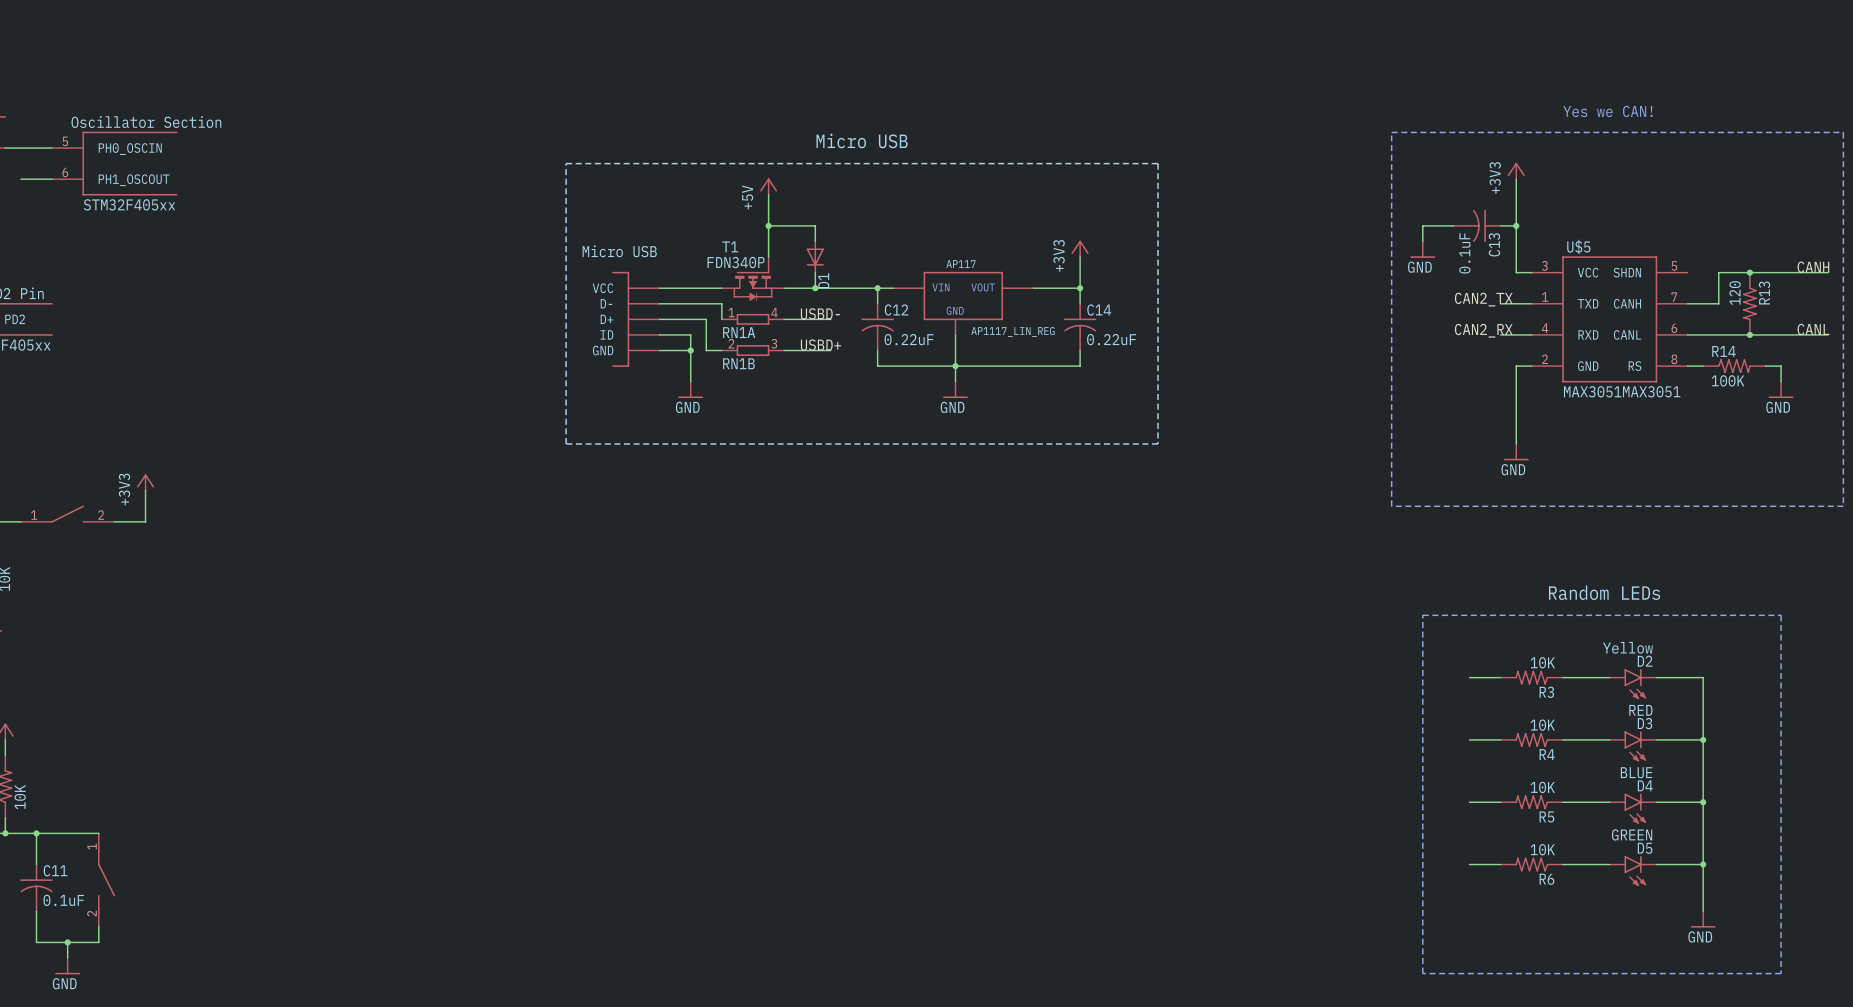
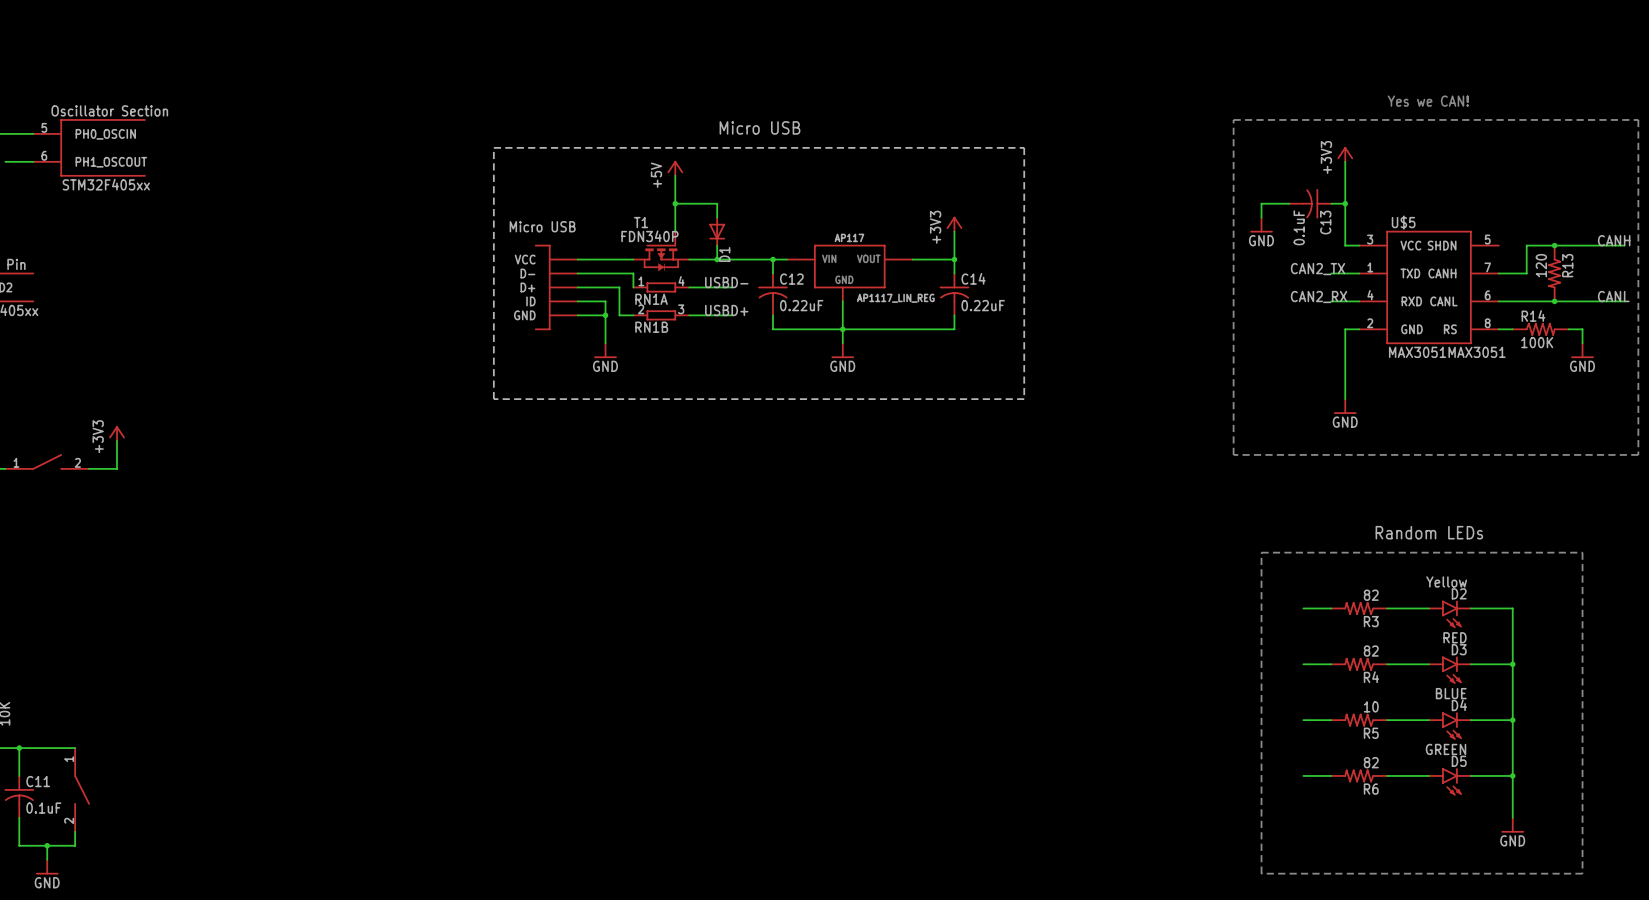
R3 value: 10K (1542, 662) -> 82 (1371, 595)
R4 value: 10K (1542, 725) -> 82 (1371, 651)
R5 value: 10K (1542, 787) -> 10 (1371, 706)
R6 value: 10K (1542, 849) -> 82 (1371, 762)

